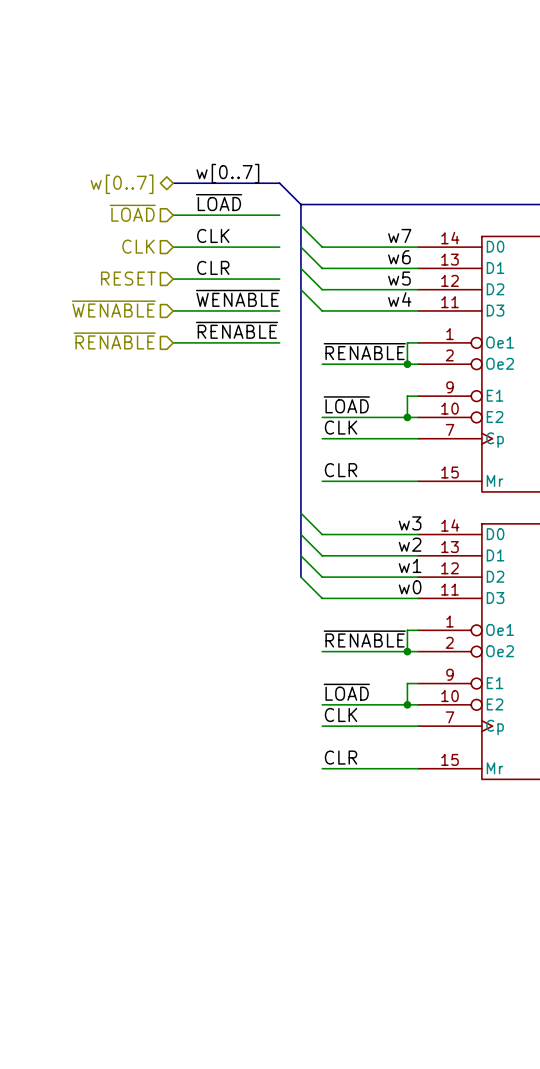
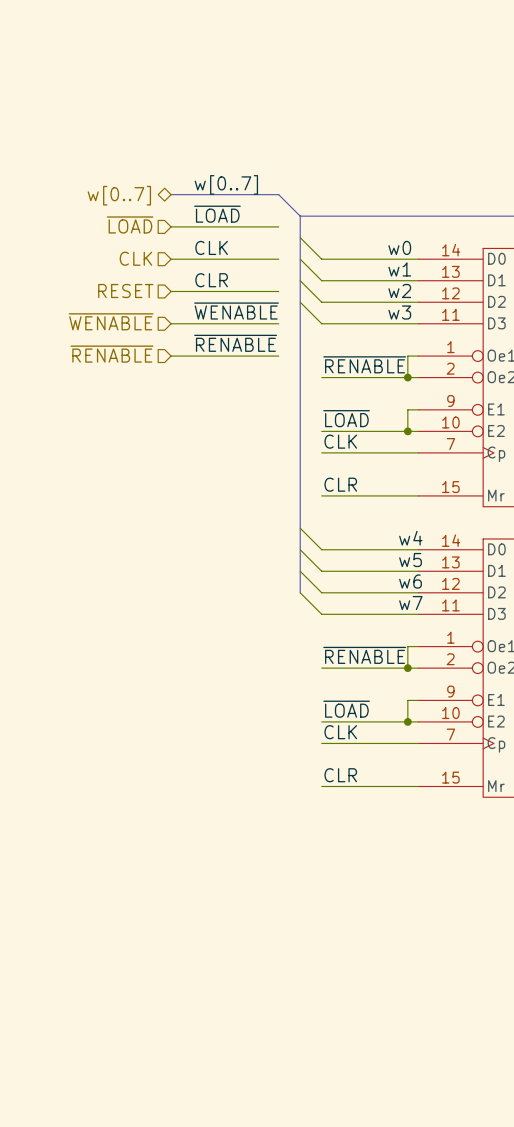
label: w7 (399, 235) -> w0 (399, 247)
label: w6 (399, 257) -> w1 (399, 269)
label: w5 (399, 278) -> w2 (399, 290)
label: w4 (399, 299) -> w3 (399, 312)
label: w3 (410, 523) -> w4 (410, 538)
label: w2 (410, 544) -> w5 (410, 560)
label: w1 (410, 565) -> w6 (410, 581)
label: w0 (410, 587) -> w7 (410, 603)

